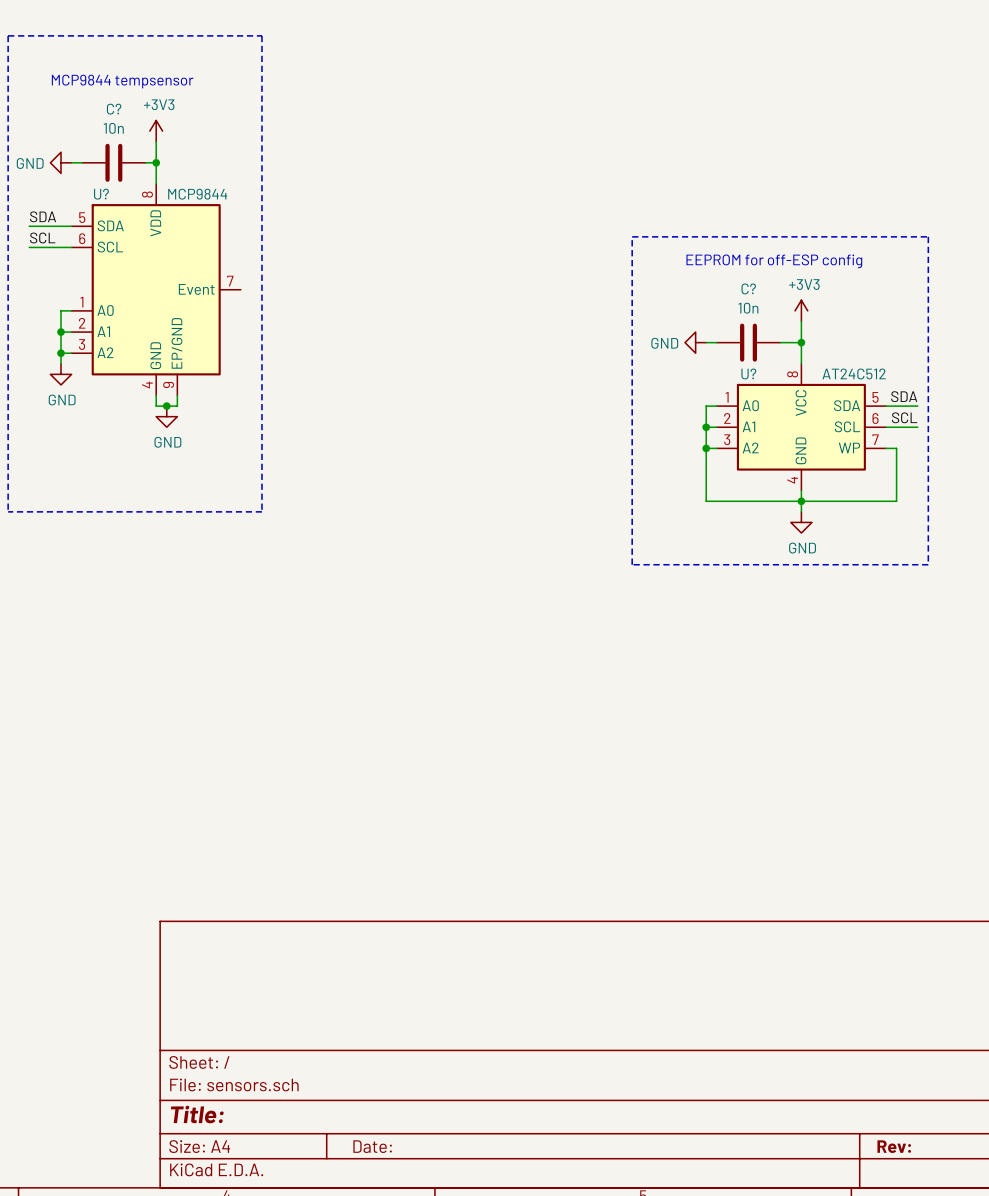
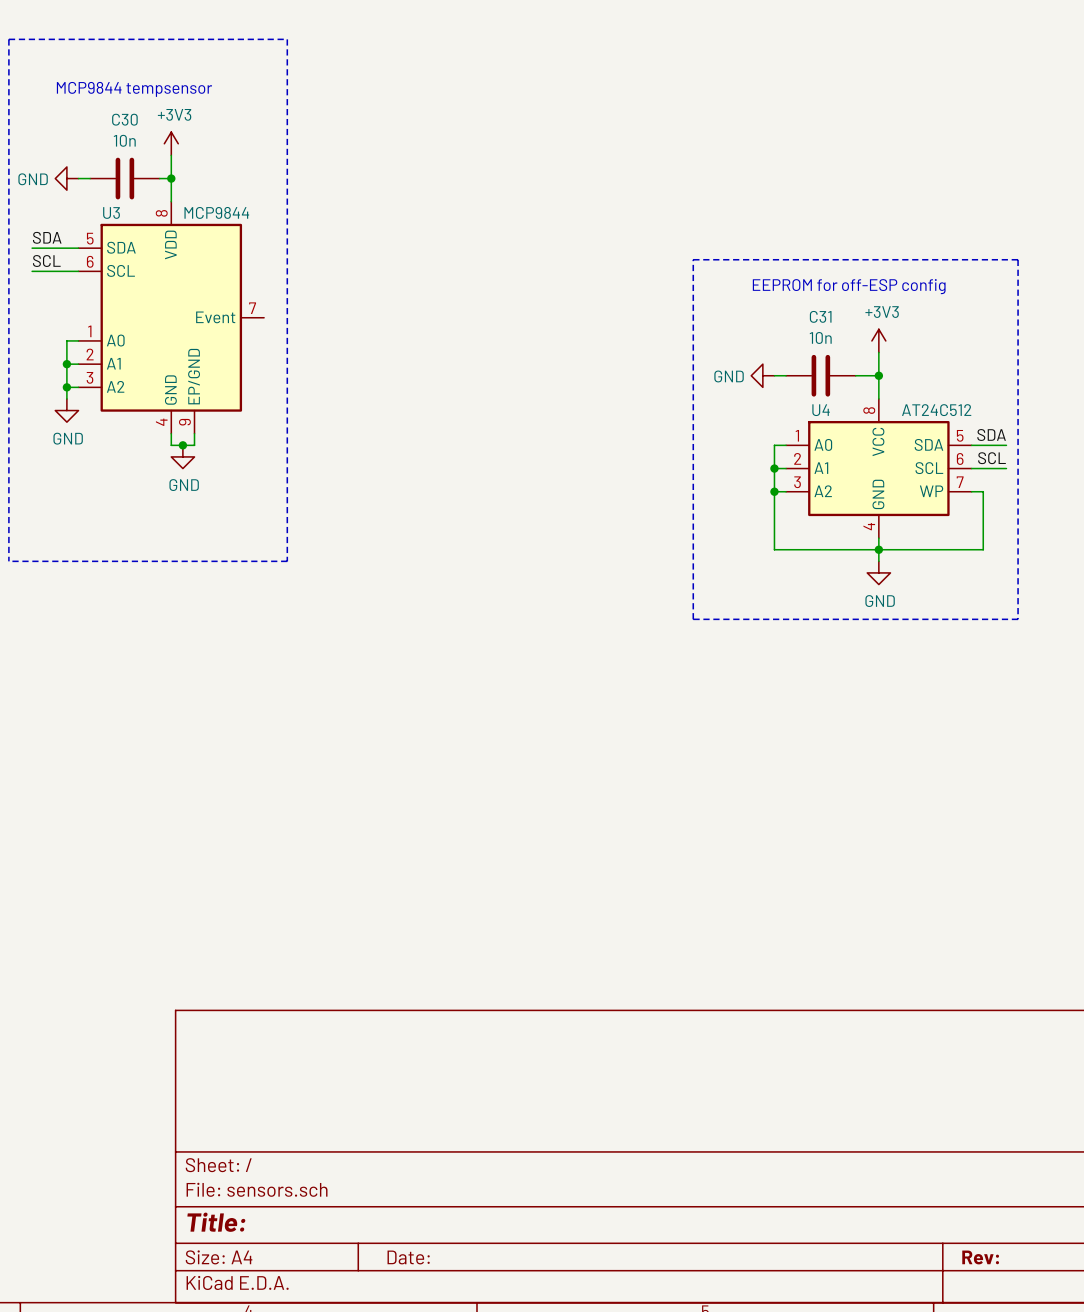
C? name: C? (114, 109) -> C30 (124, 119)
U? name: U? (101, 194) -> U3 (111, 212)
C? name: C? (748, 288) -> C31 (820, 316)
U? name: U? (748, 373) -> U4 (821, 410)

